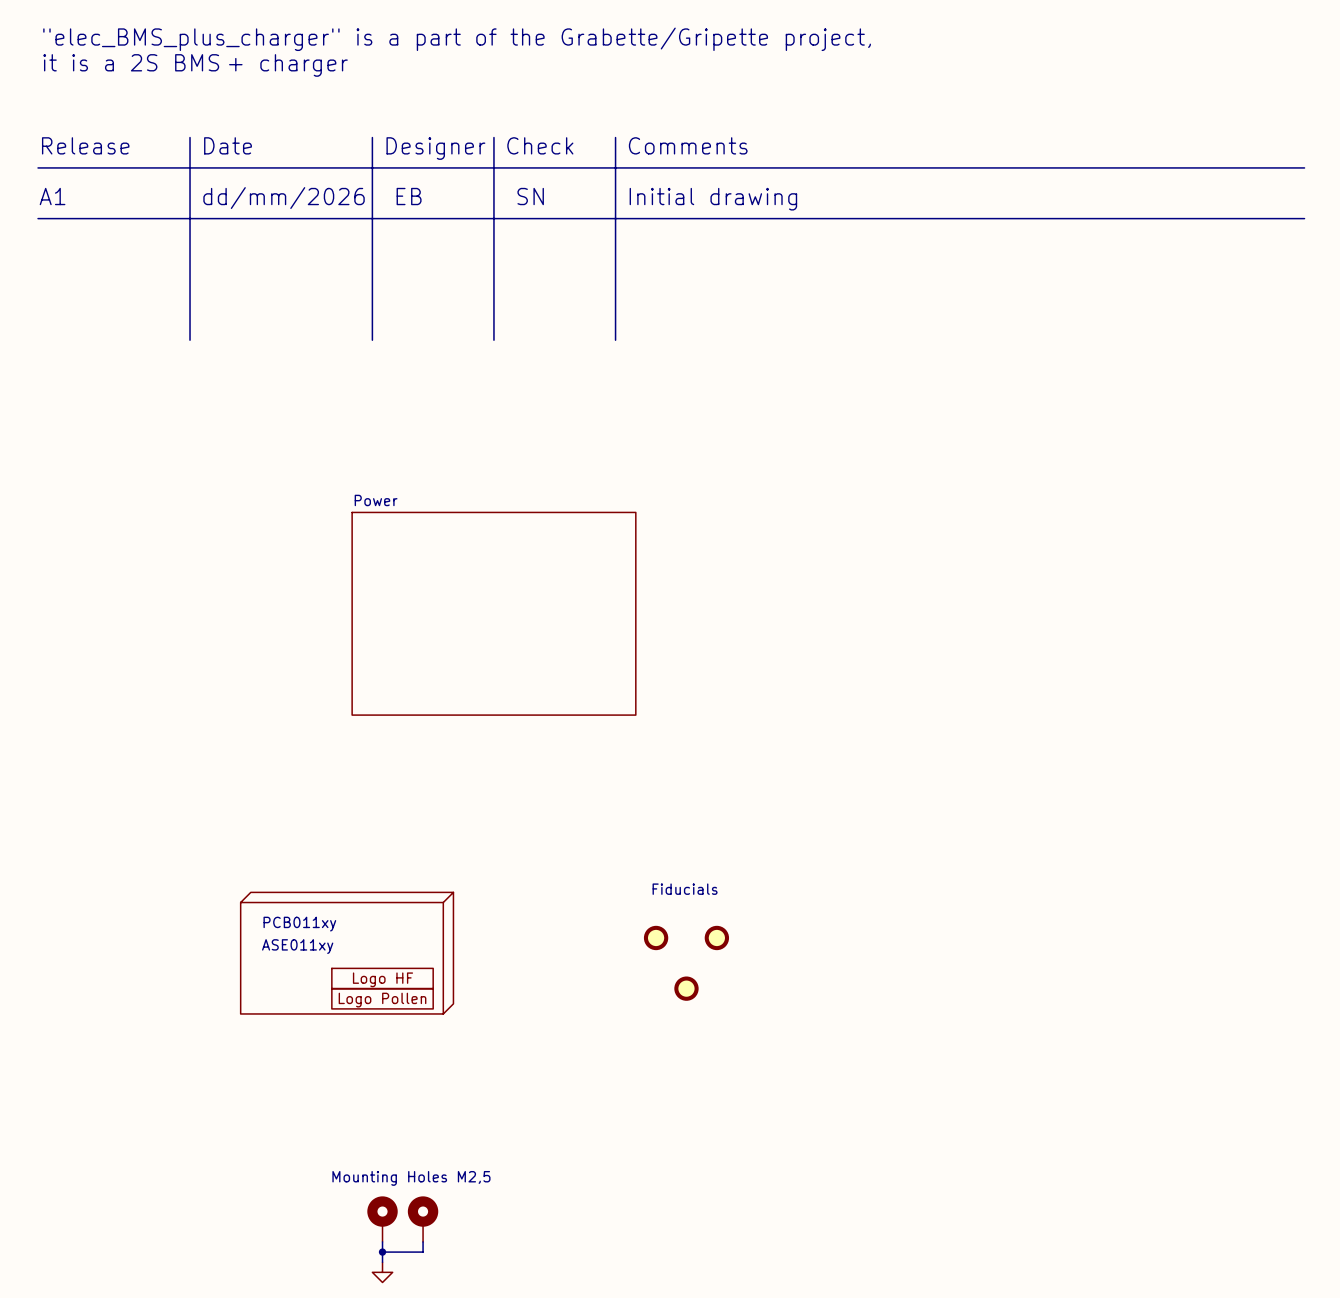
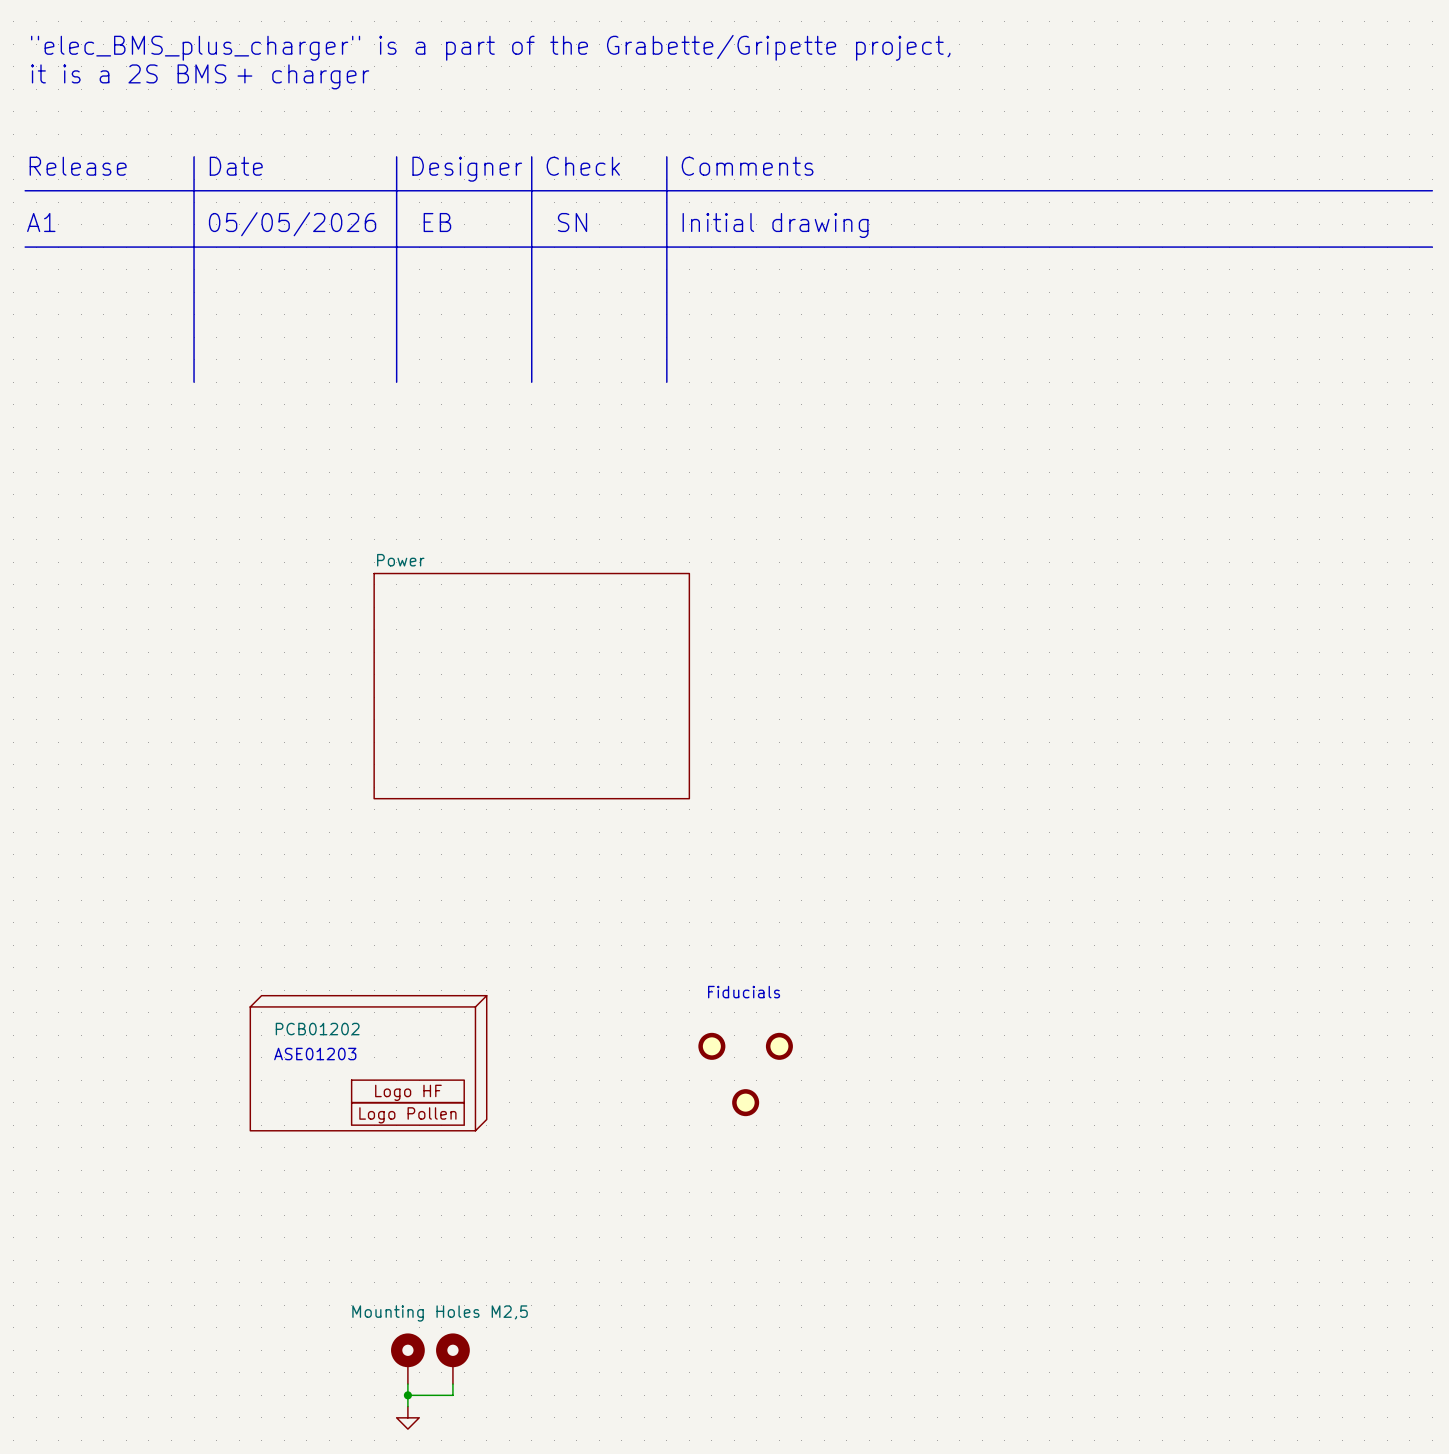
text: dd/mm/2026 (284, 198) -> 05/05/2026 (292, 224)
part value: PCB011xy (299, 924) -> PCB01202 (317, 1029)
text: ASE011xy (297, 946) -> ASE01203 (315, 1054)

